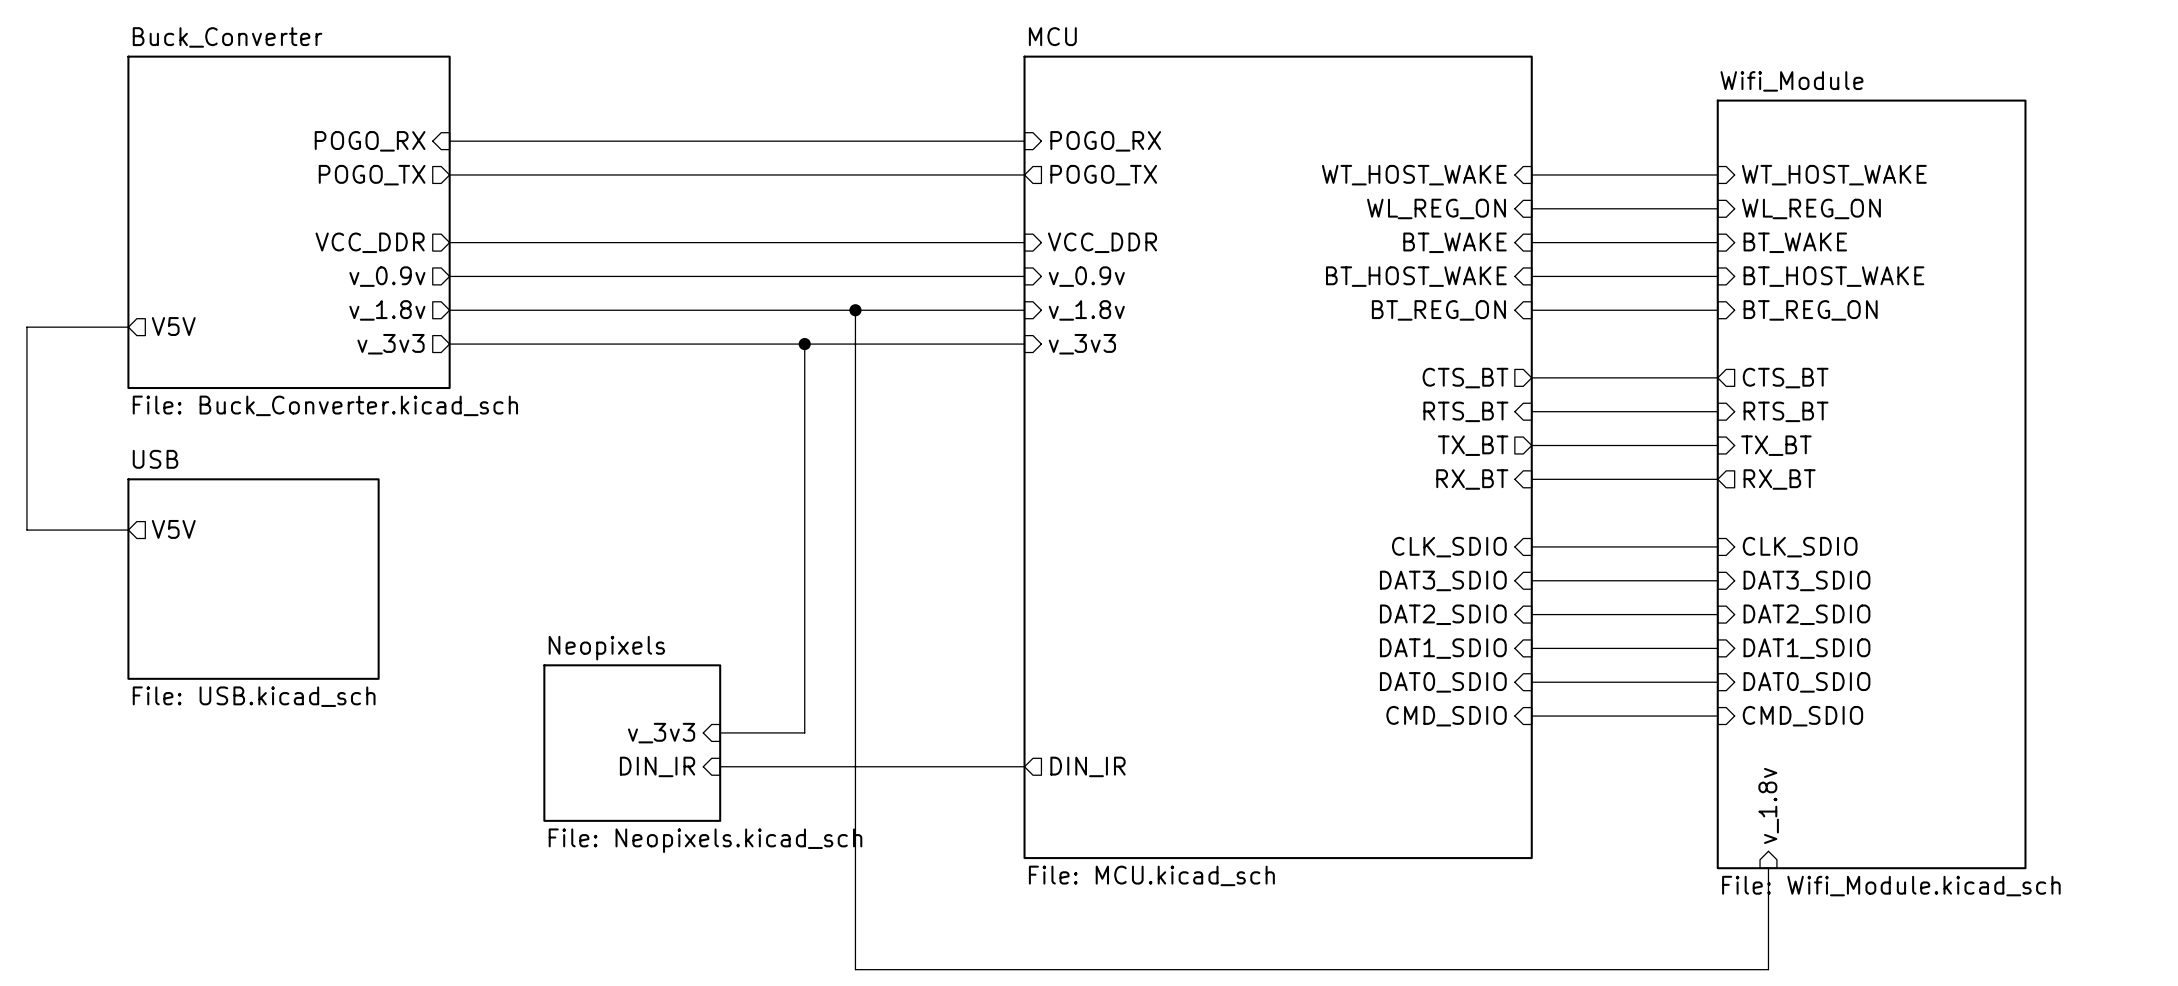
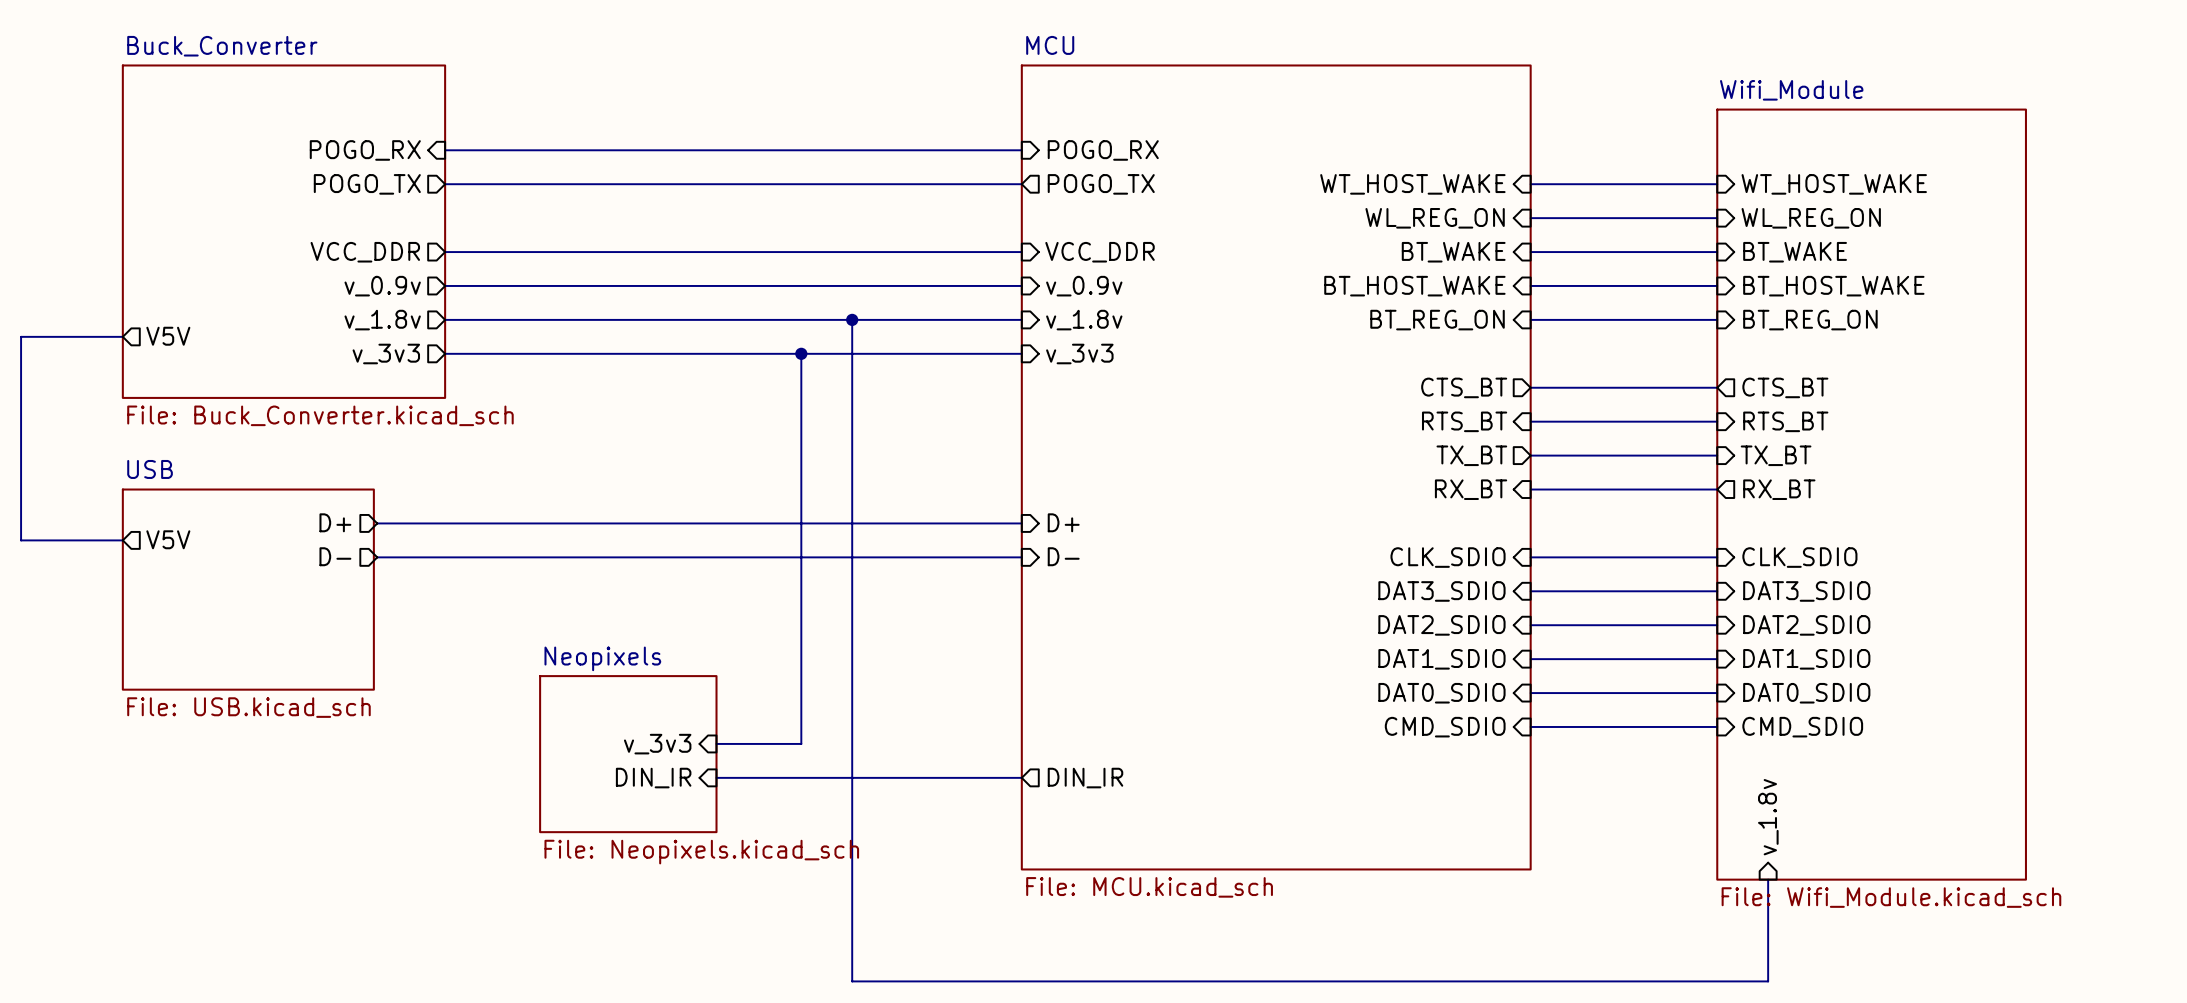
sheet pin: none -> D+ (335, 522)
sheet pin: none -> D+ (1063, 522)
wire: none -> (377, 523) (1021, 523)
sheet pin: none -> D- (335, 556)
wire: none -> (377, 557) (1021, 557)
sheet pin: none -> D- (1063, 556)

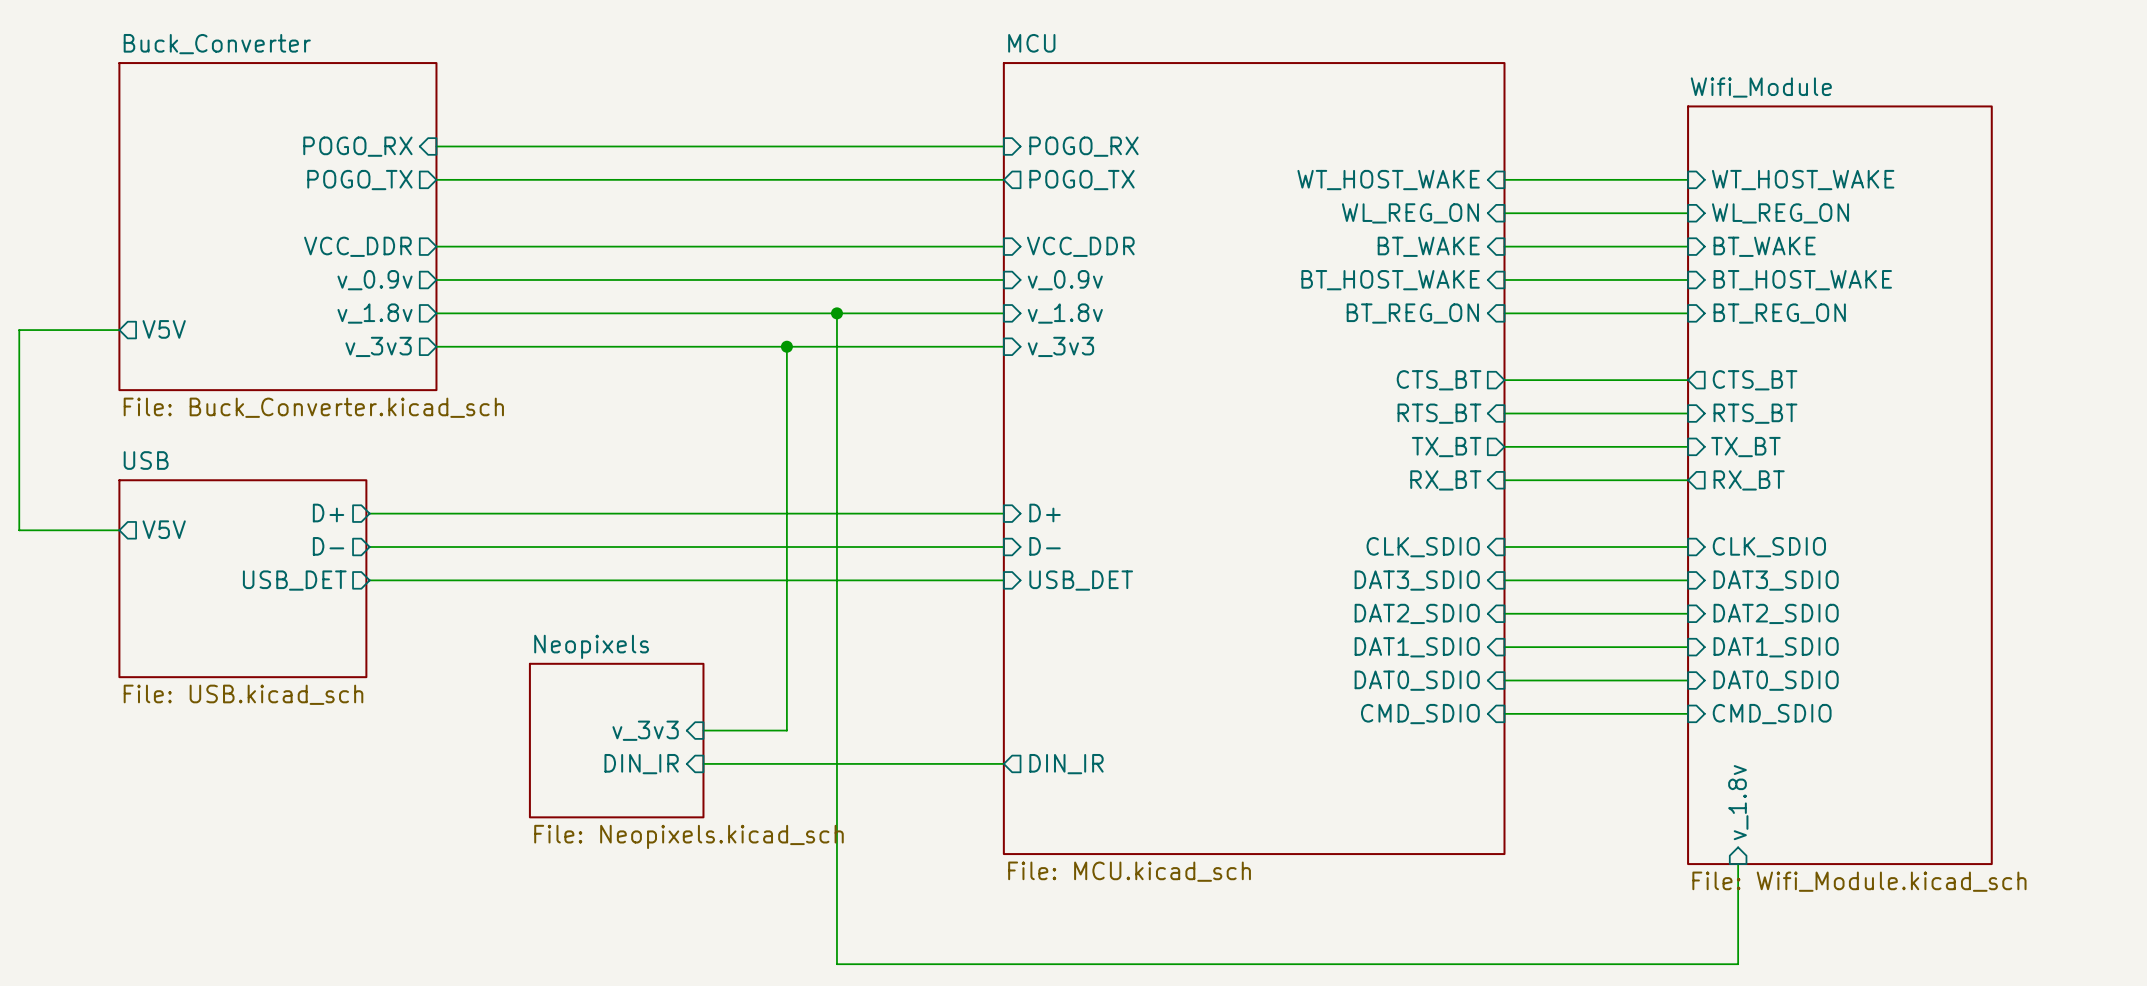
sheet pin: none -> USB_DET (294, 580)
wire: none -> (369, 580) (1003, 580)
sheet pin: none -> USB_DET (1081, 580)

